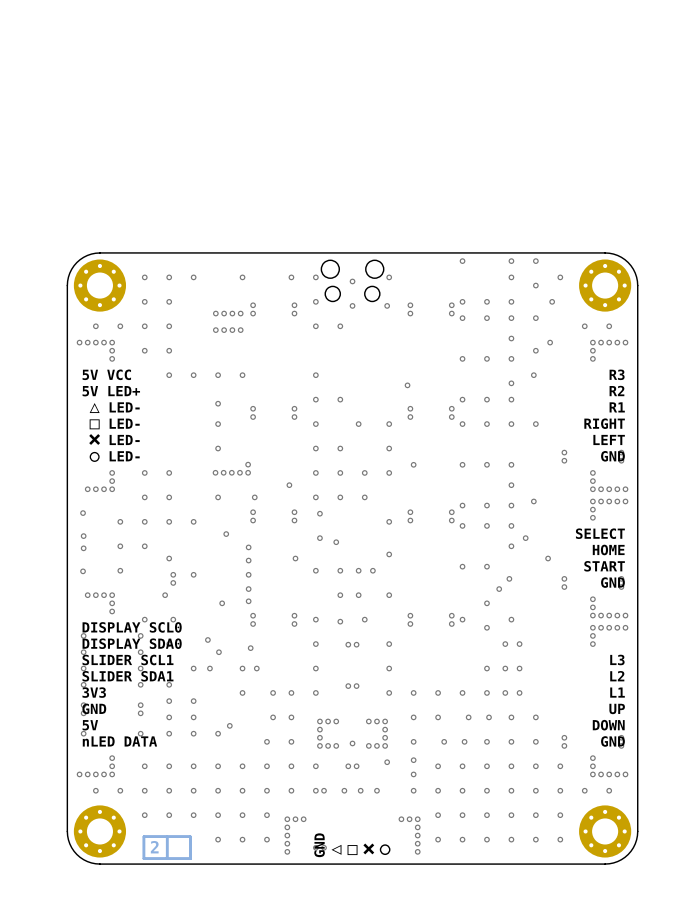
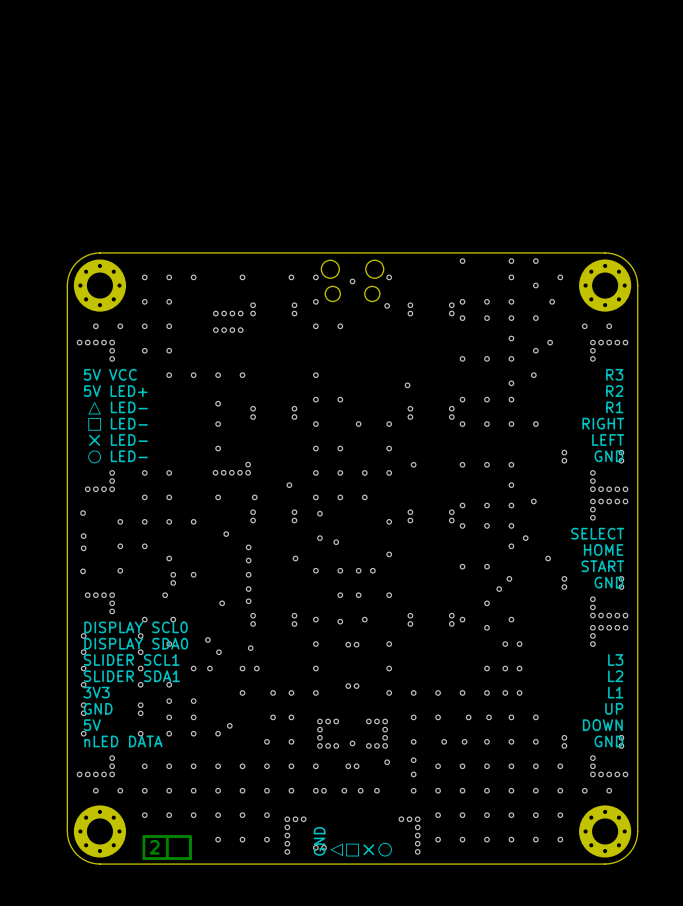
via: (352, 305) -> none

